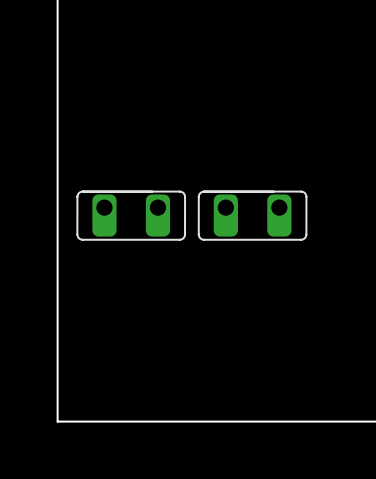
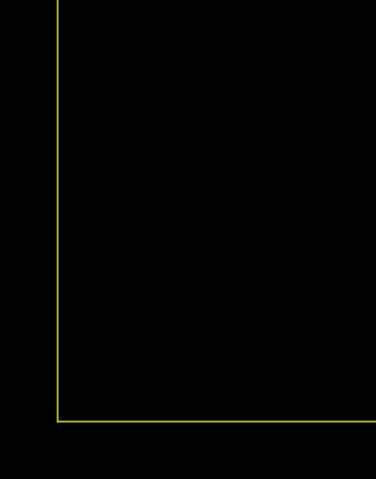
part: (131, 215) -> none
part: (252, 215) -> none

